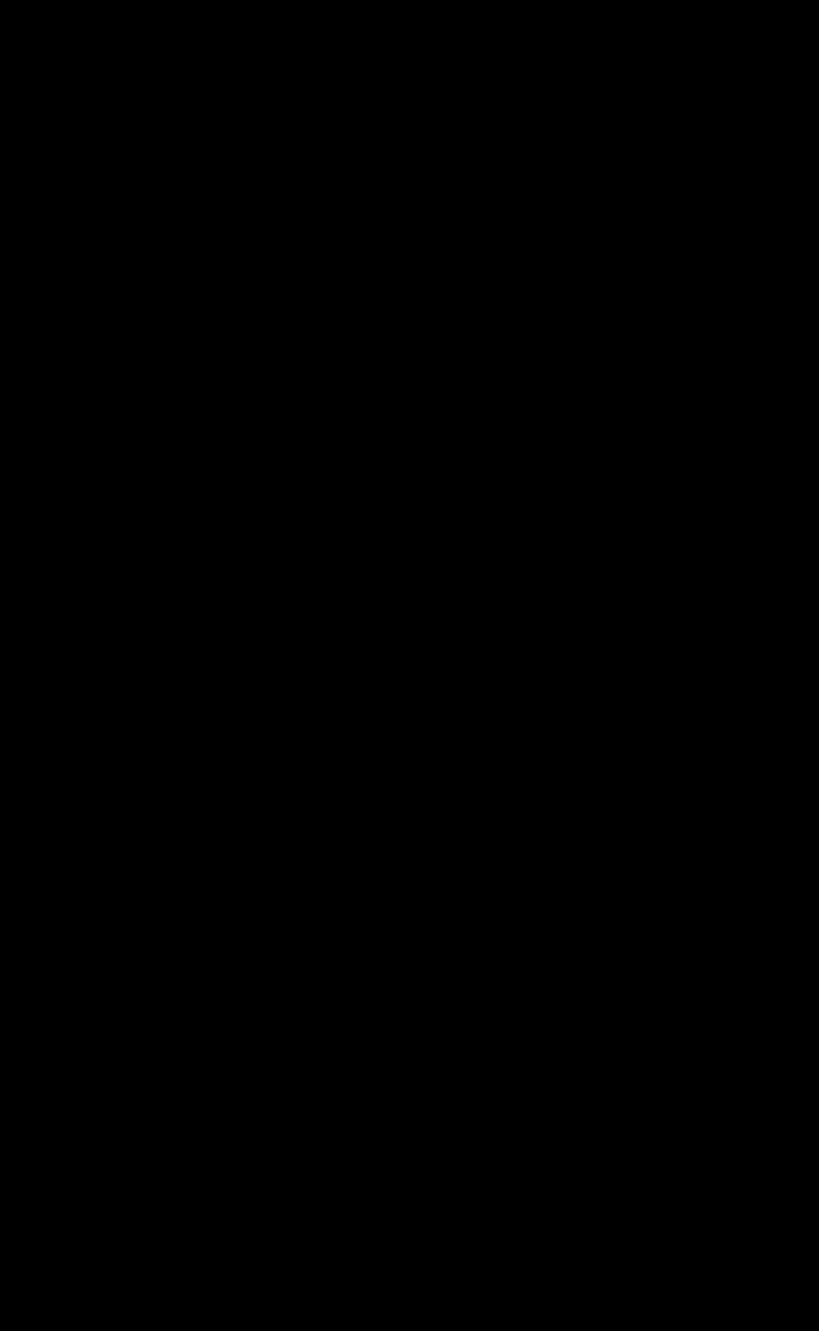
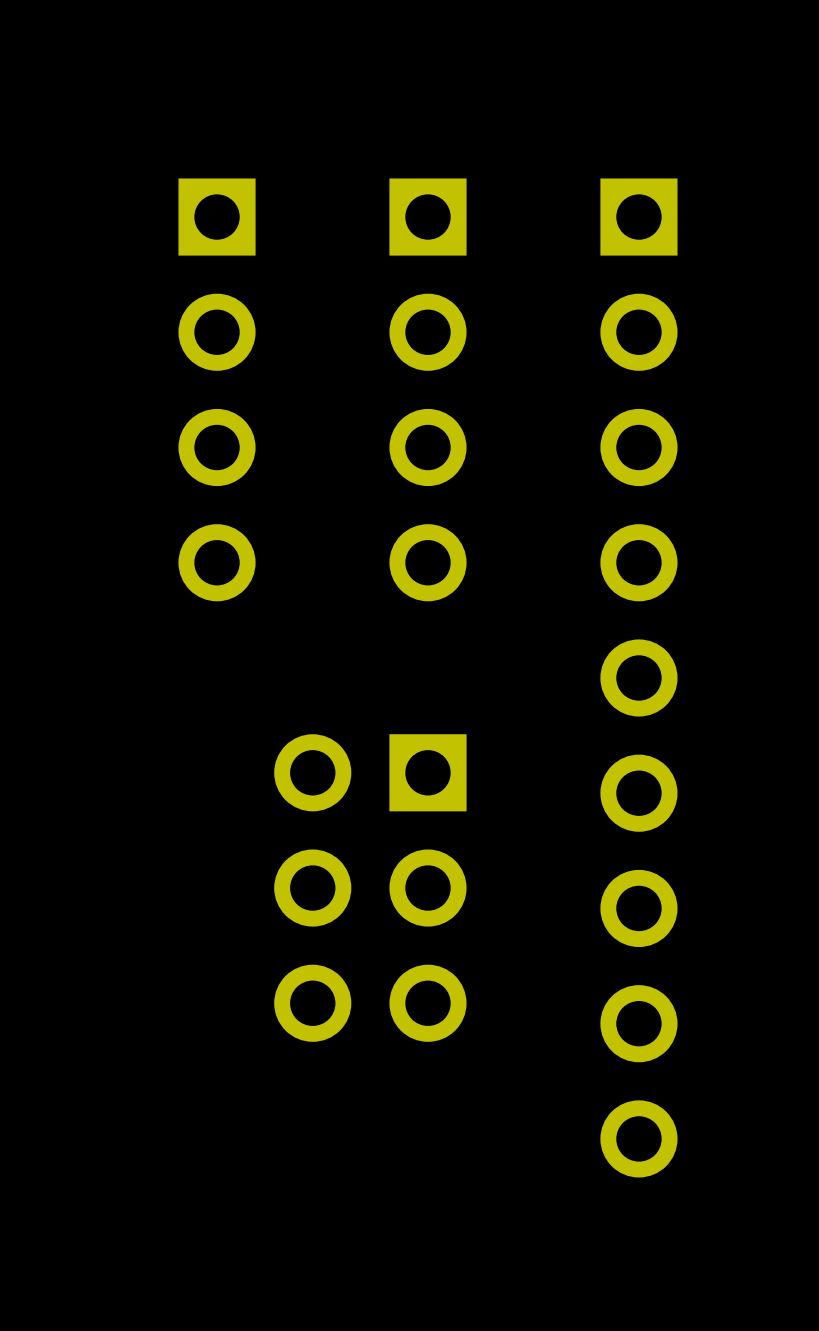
part: none -> (217, 389)
part: none -> (428, 389)
part: none -> (638, 677)
part: none -> (370, 888)

